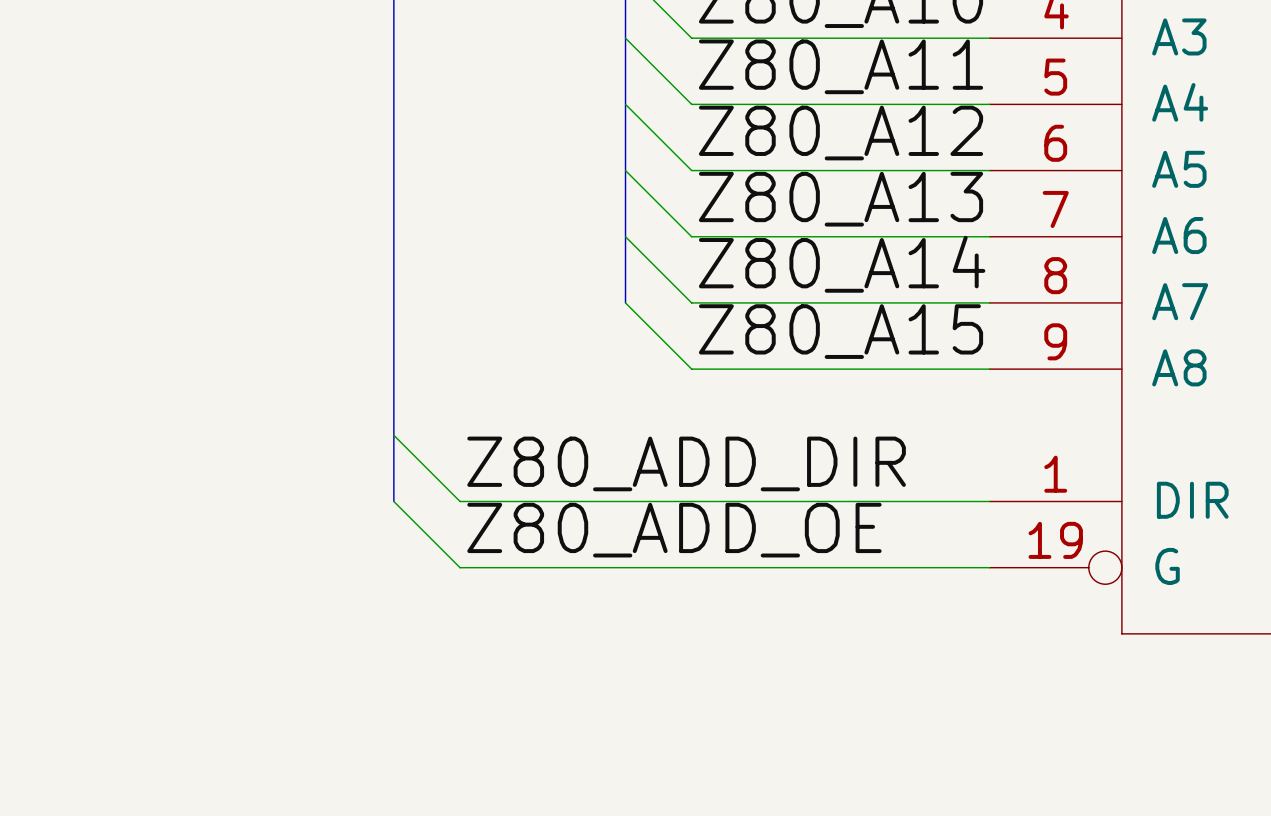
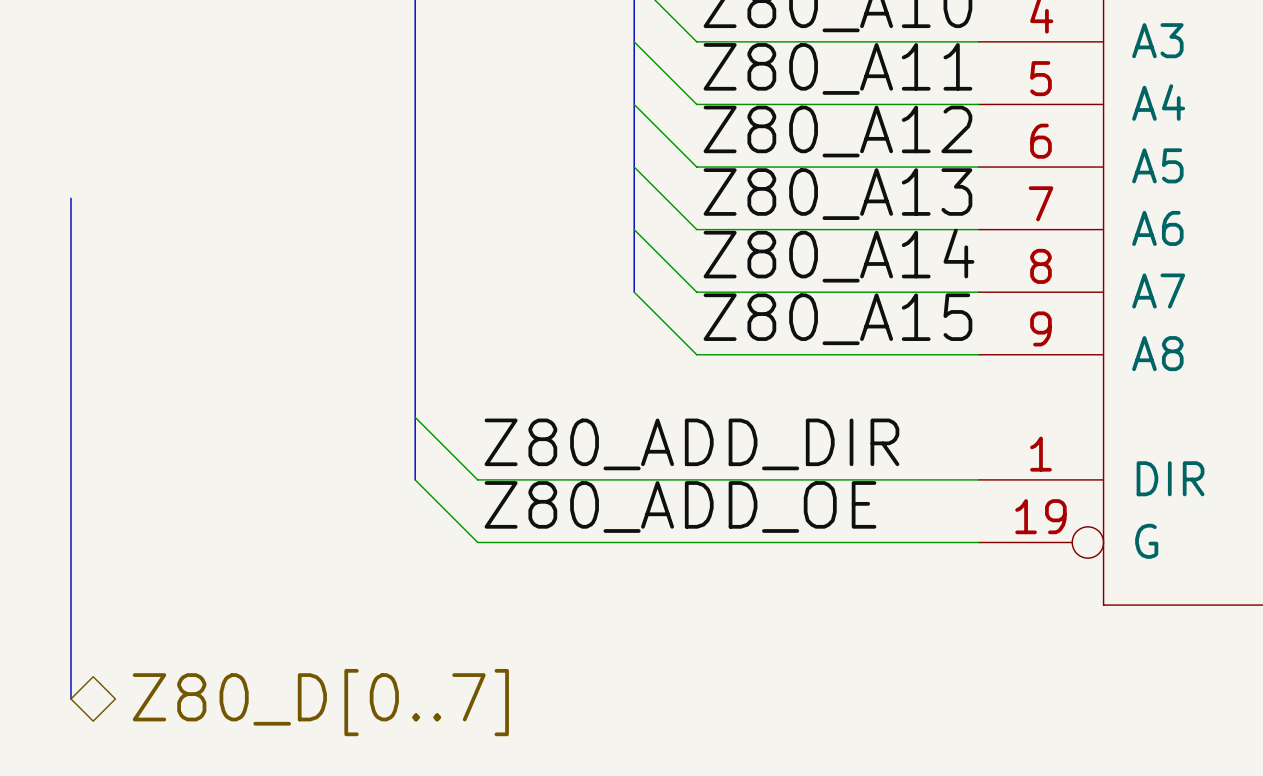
bus: none -> (70, 198) (70, 698)
hierarchical label: none -> Z80_D[0..7] (320, 702)

